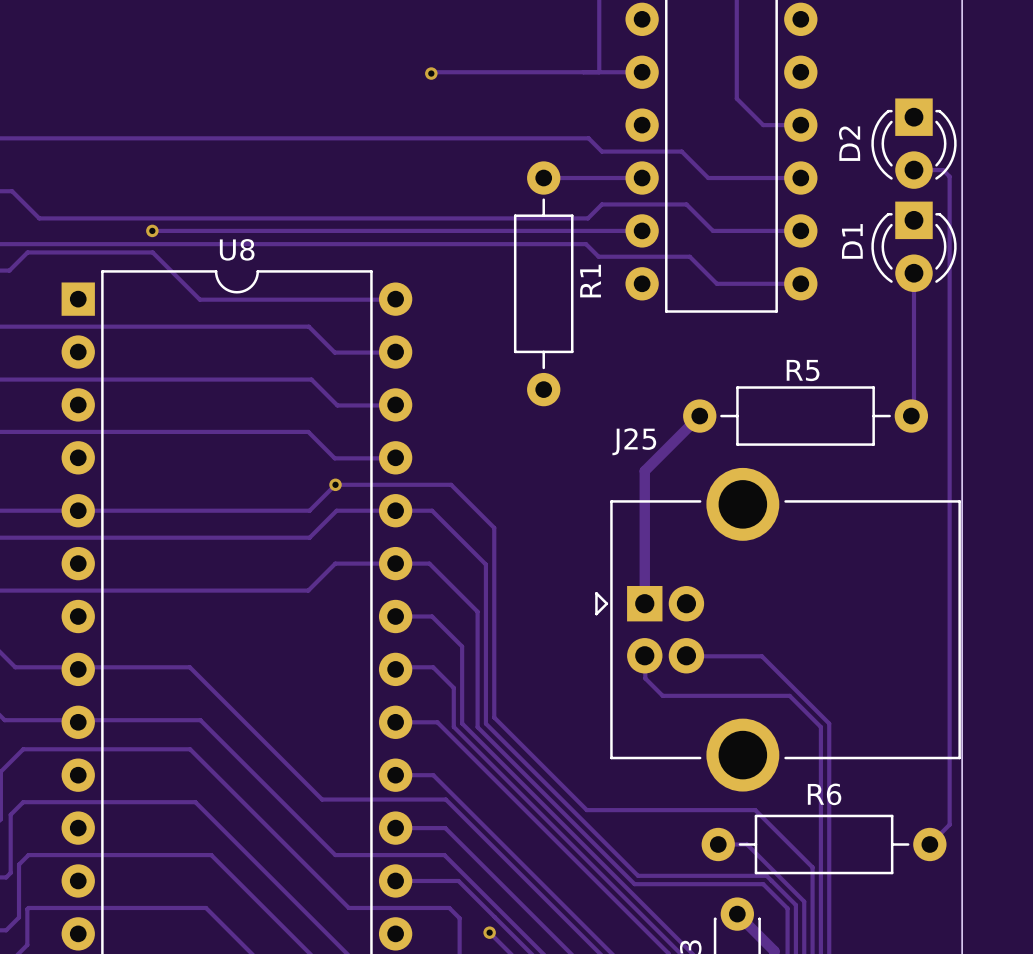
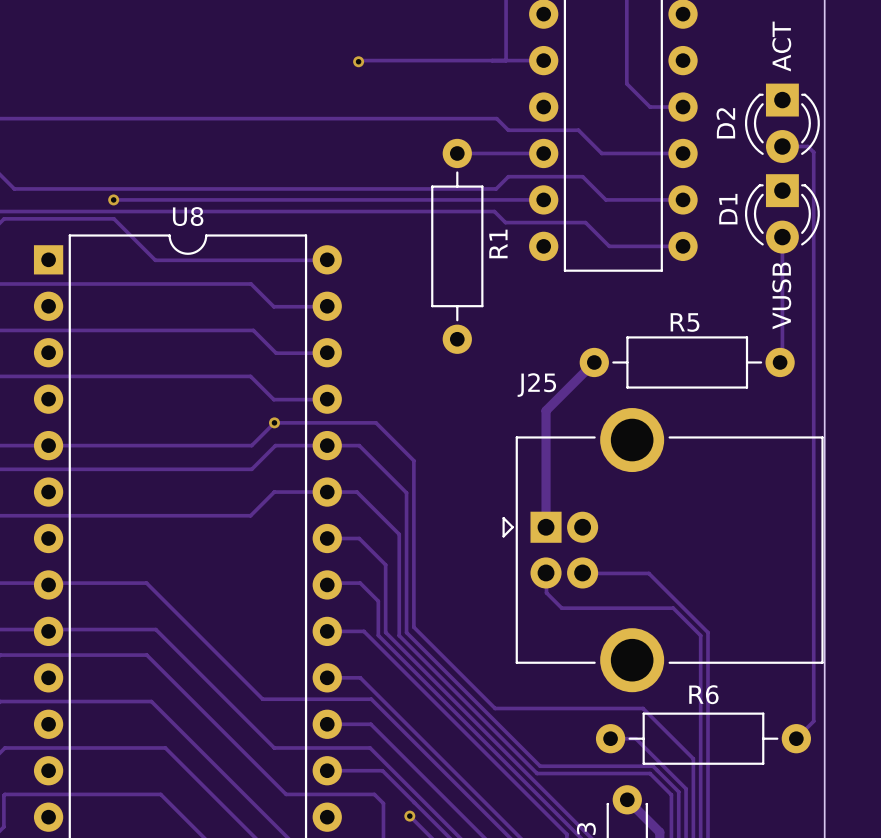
D2 value: none -> ACT (781, 46)
D1 value: none -> VUSB (781, 295)

